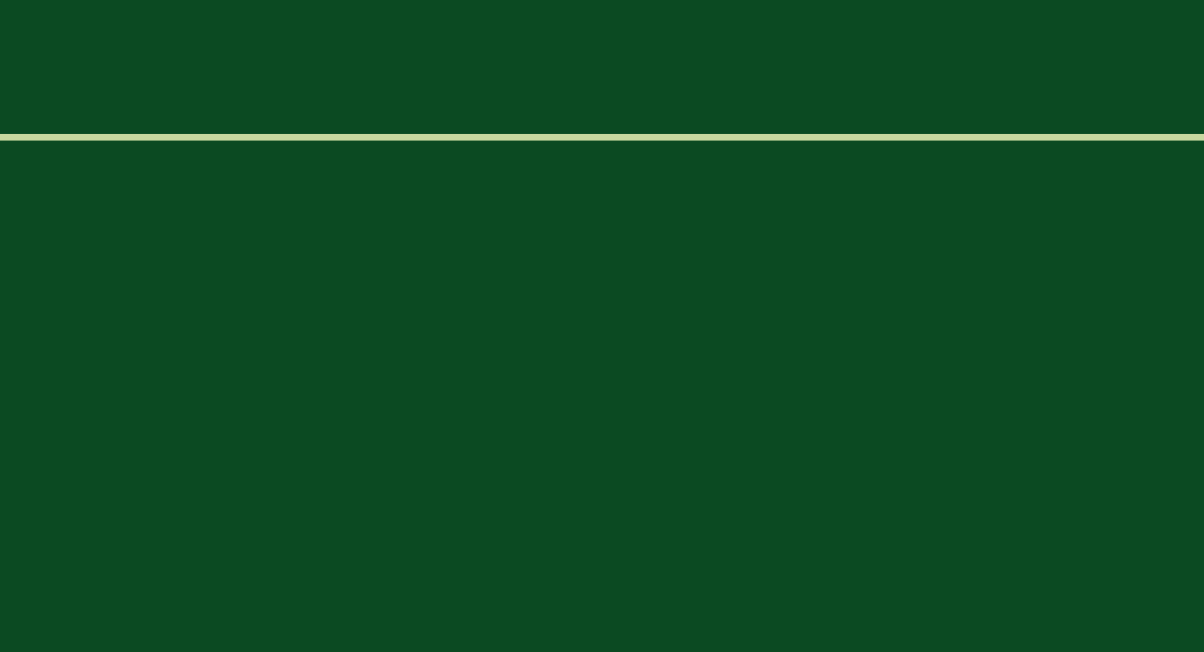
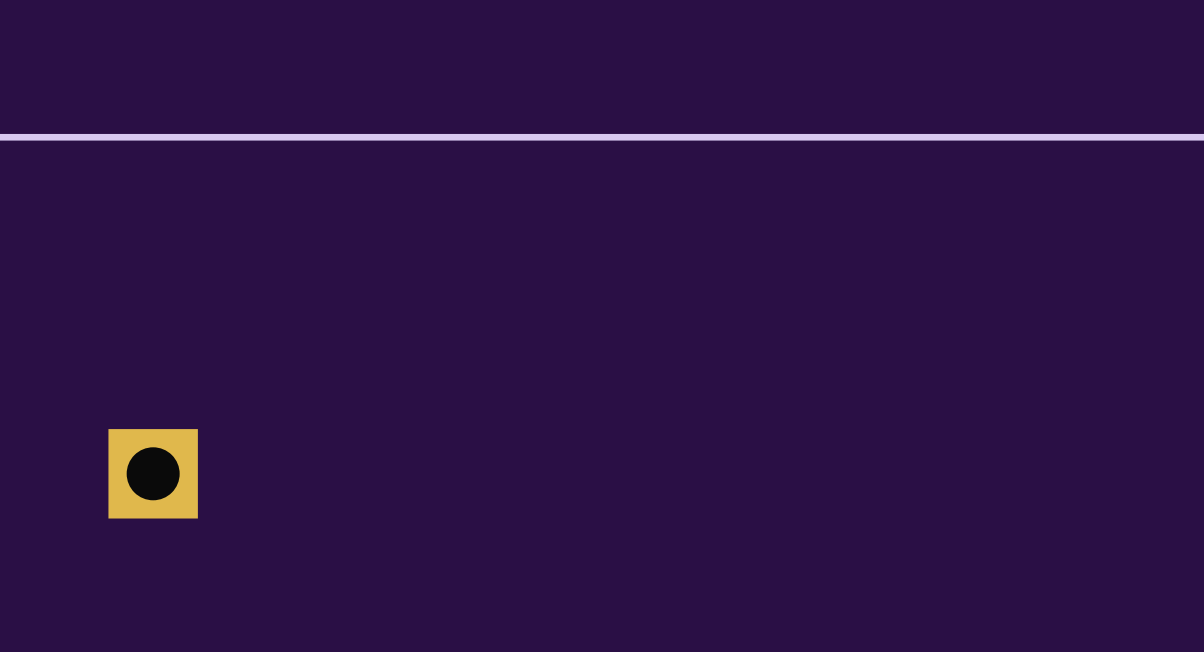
part: none -> (153, 473)

